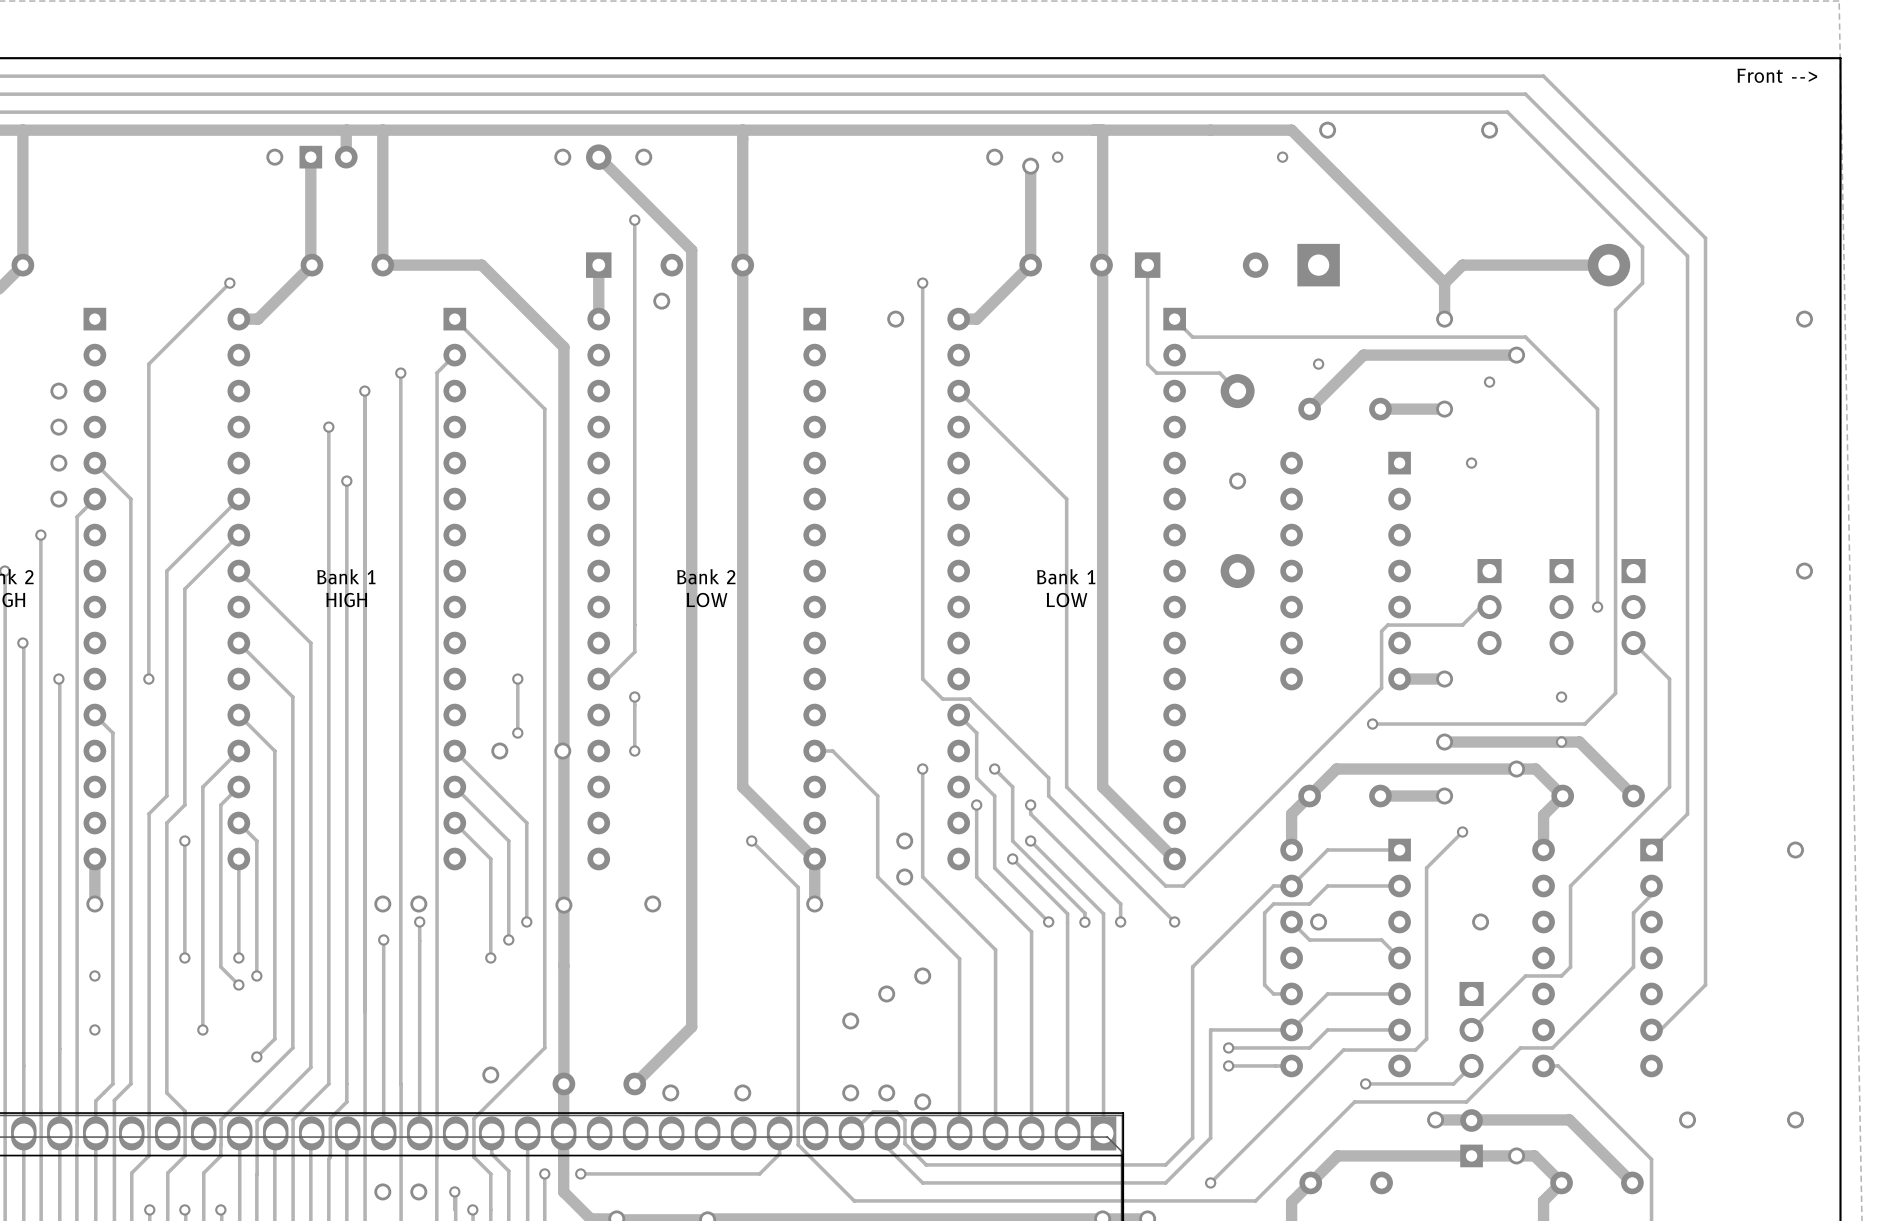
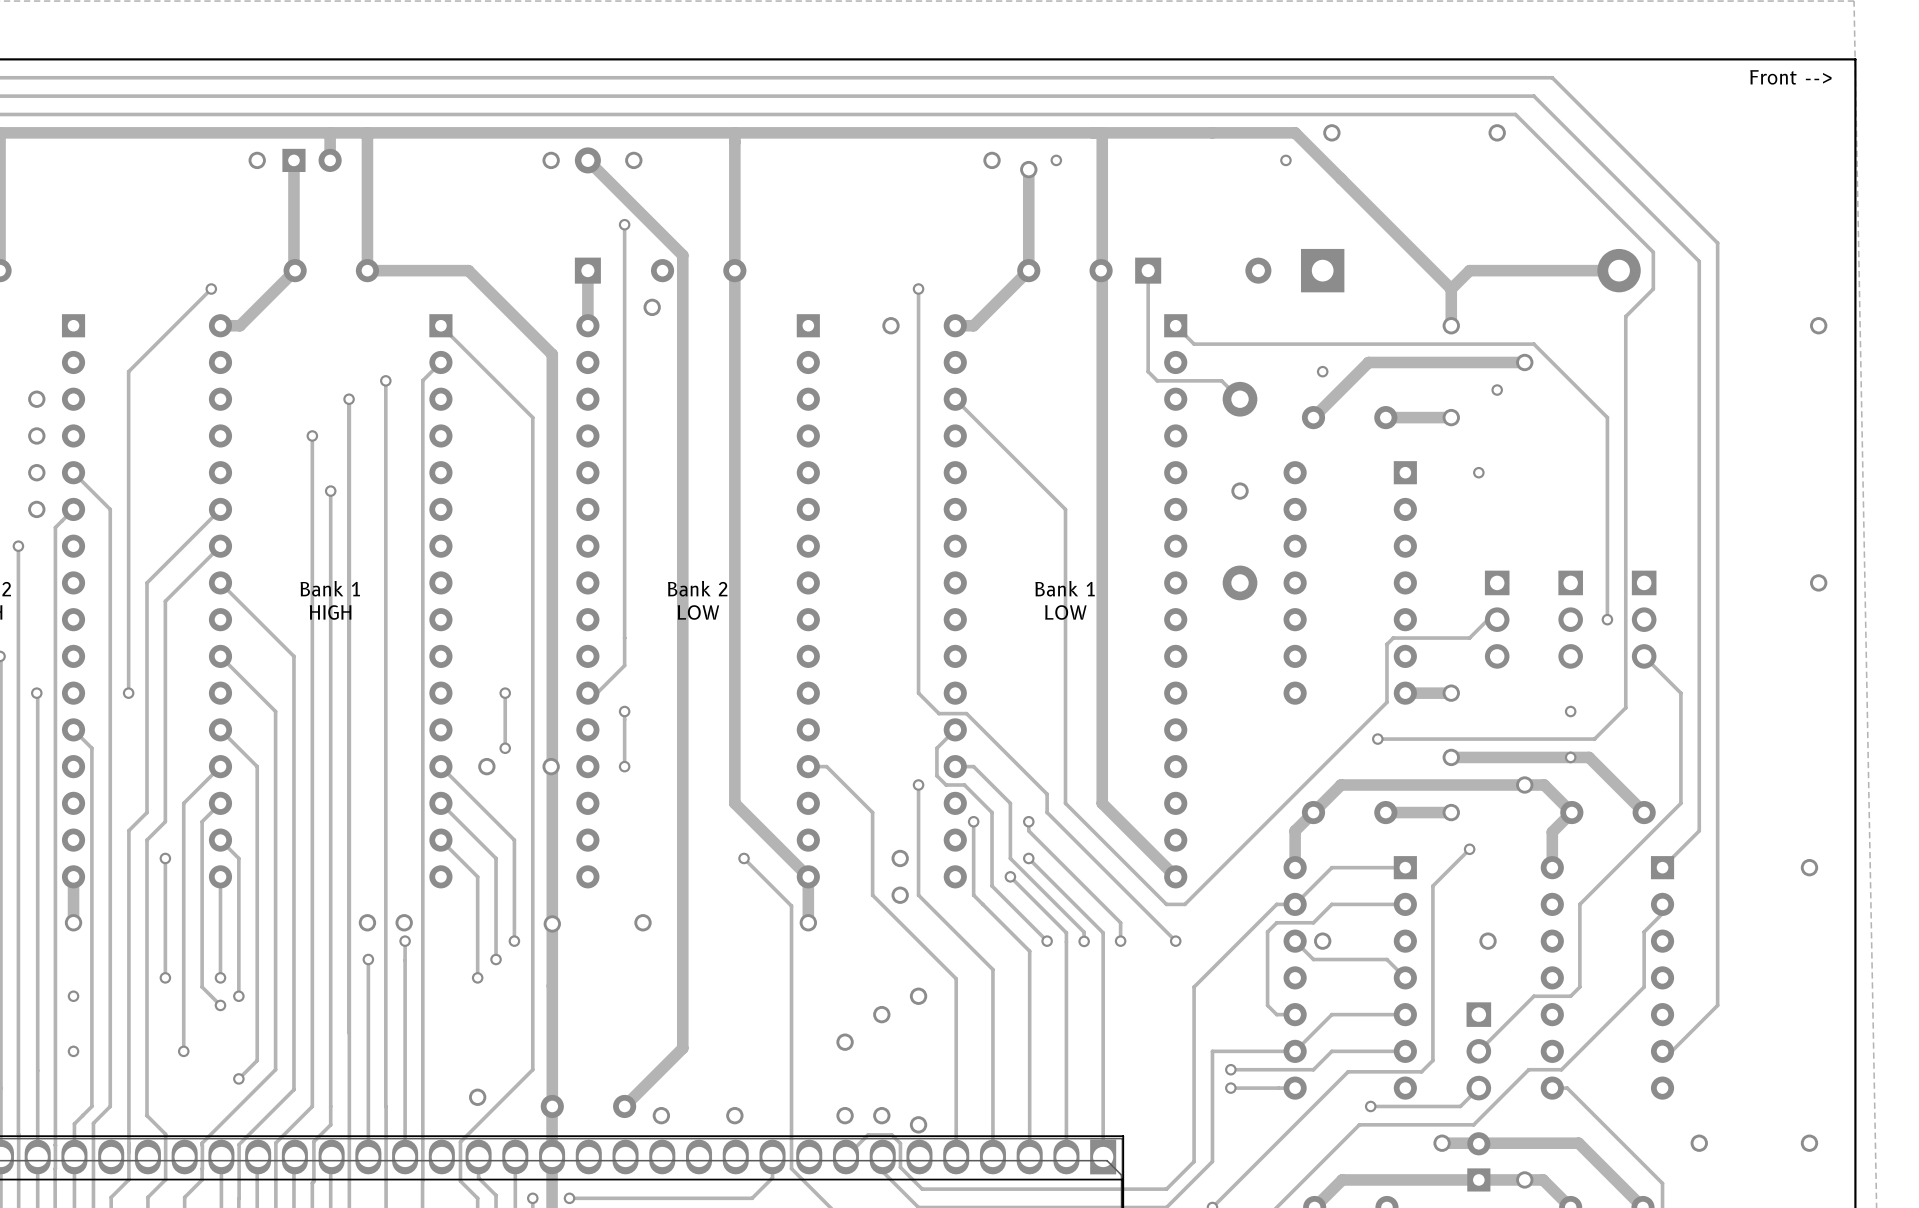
track: (958, 715) (976, 733) (976, 778) -> (955, 729) (936, 748) (936, 775) (946, 784) (964, 784) (973, 794)
track: none -> (955, 766) (973, 766) (992, 784)
via: (994, 769) -> none

